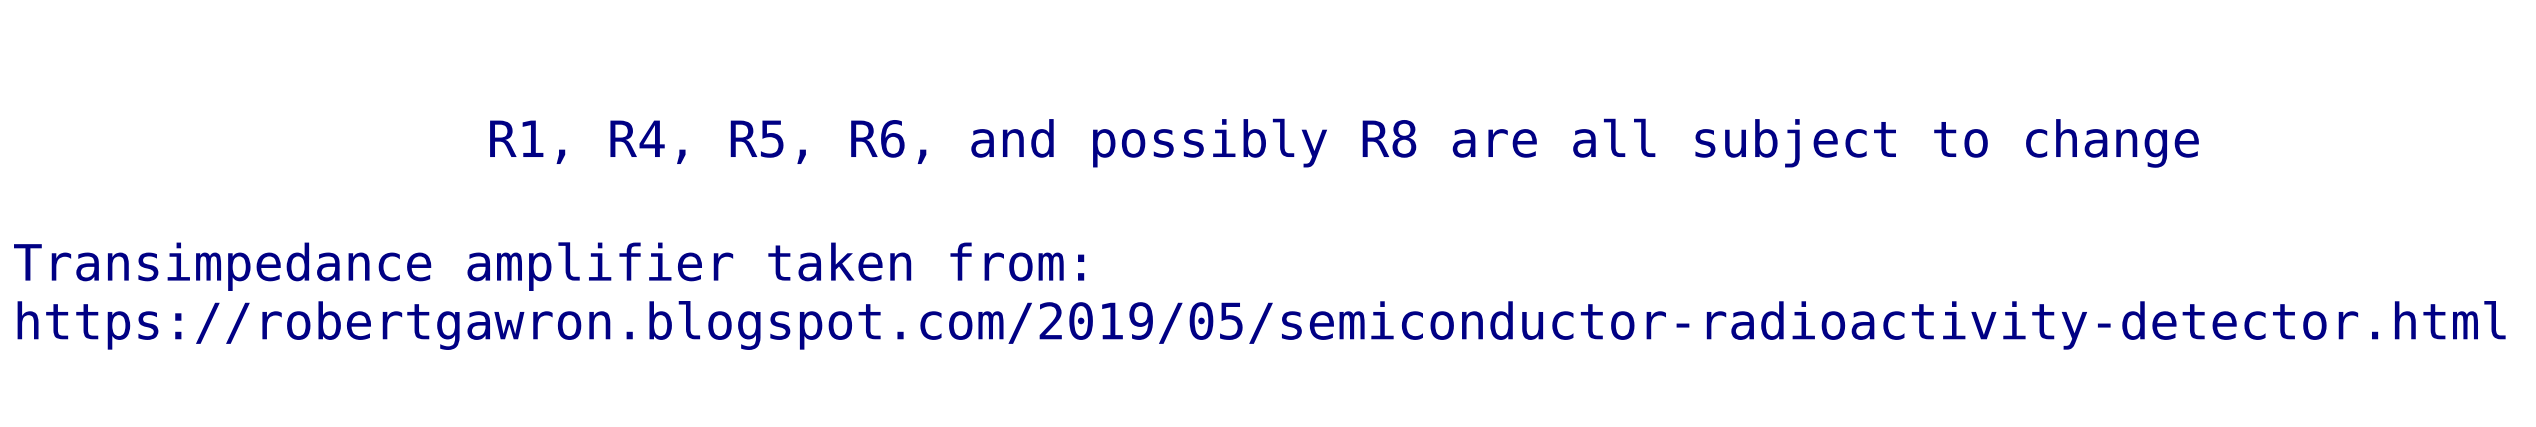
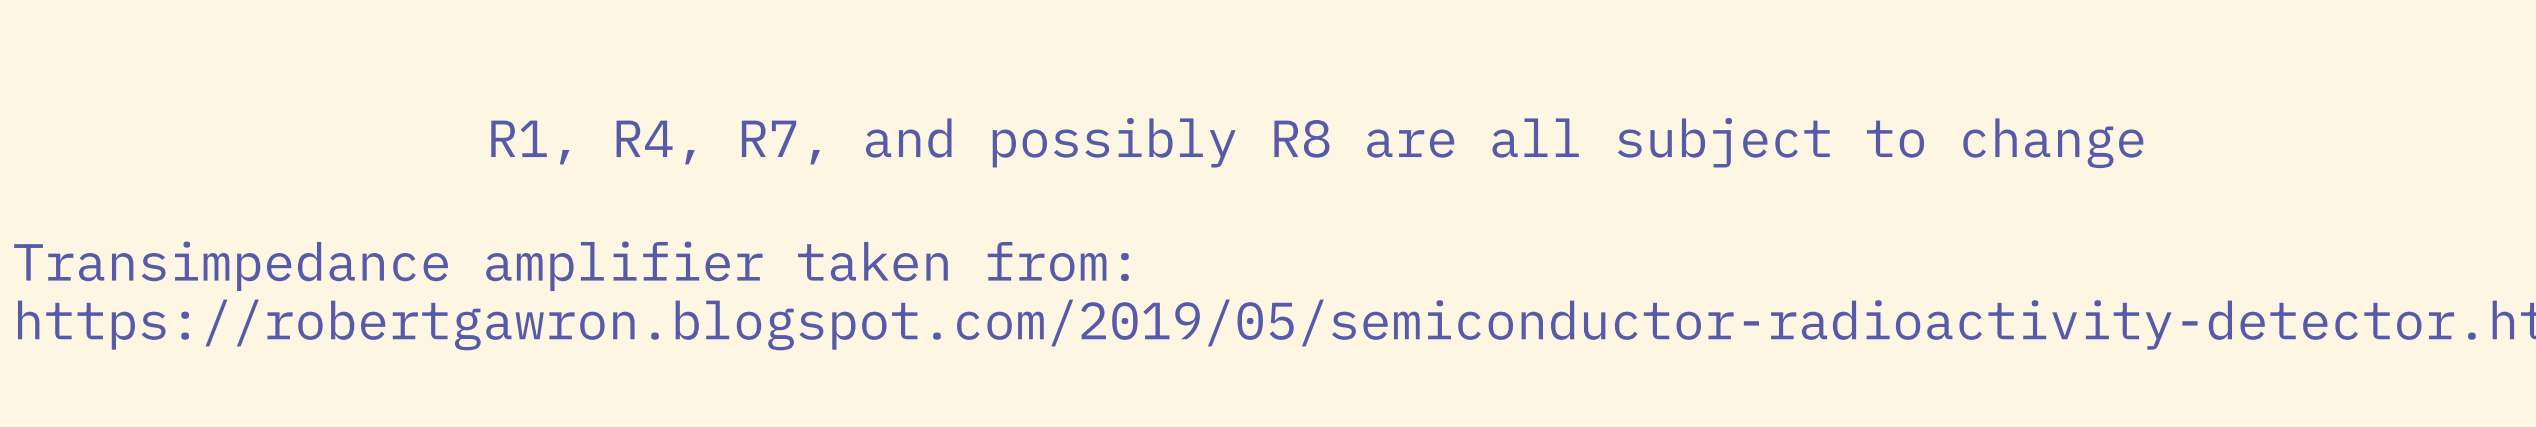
text: R1, R4, R5, R6, and possibly R8 are all subject to change (1344, 143) -> R1, R4, R7, and possibly R8 are all subject to change (1317, 143)

